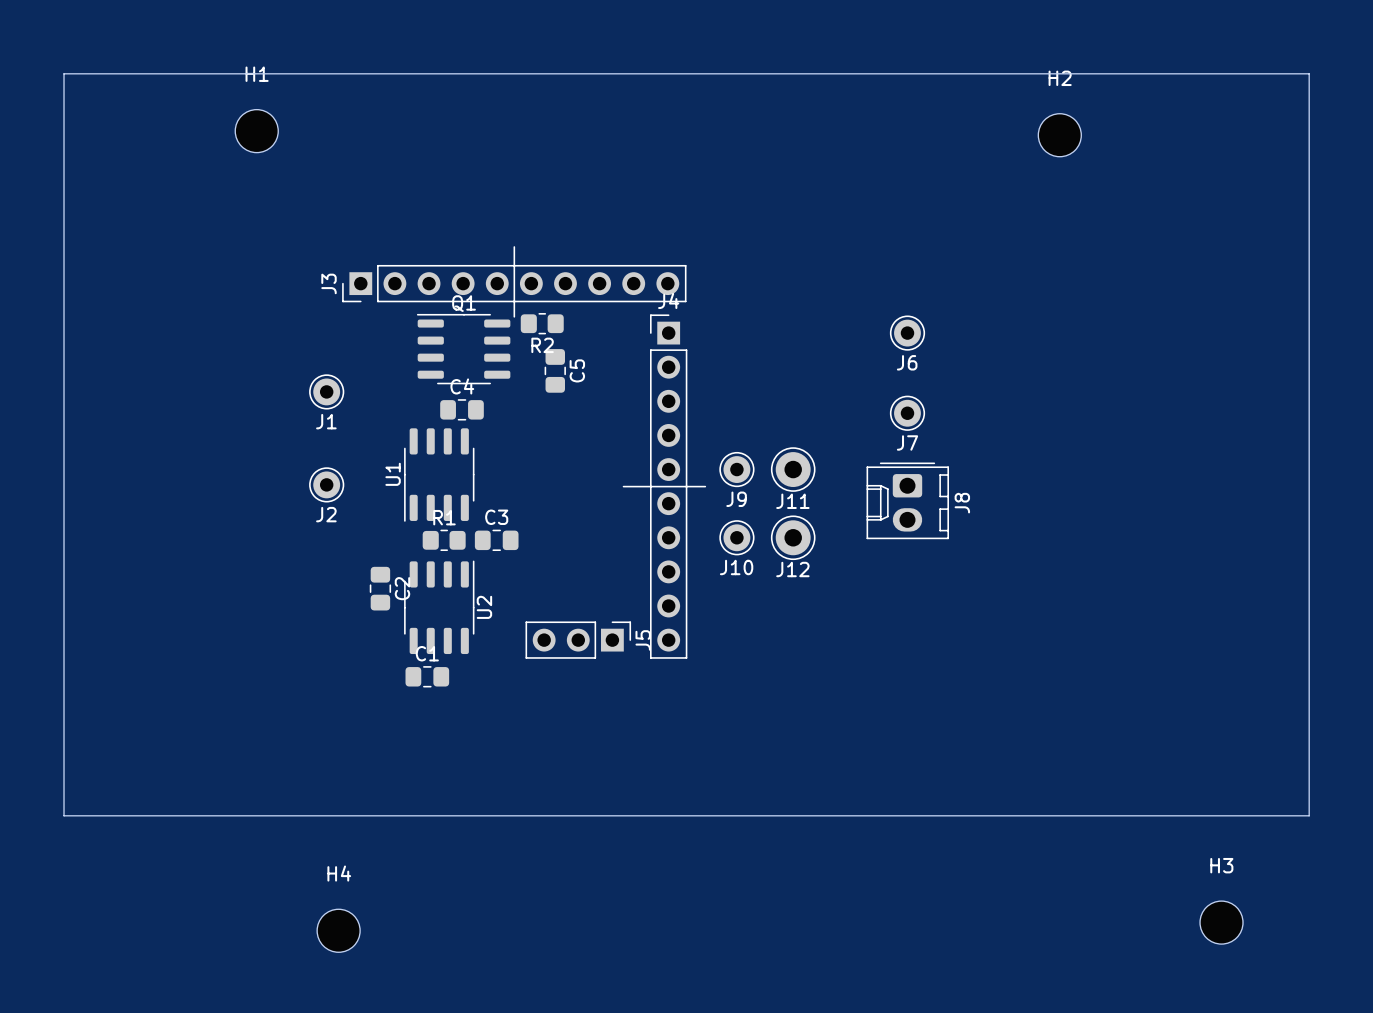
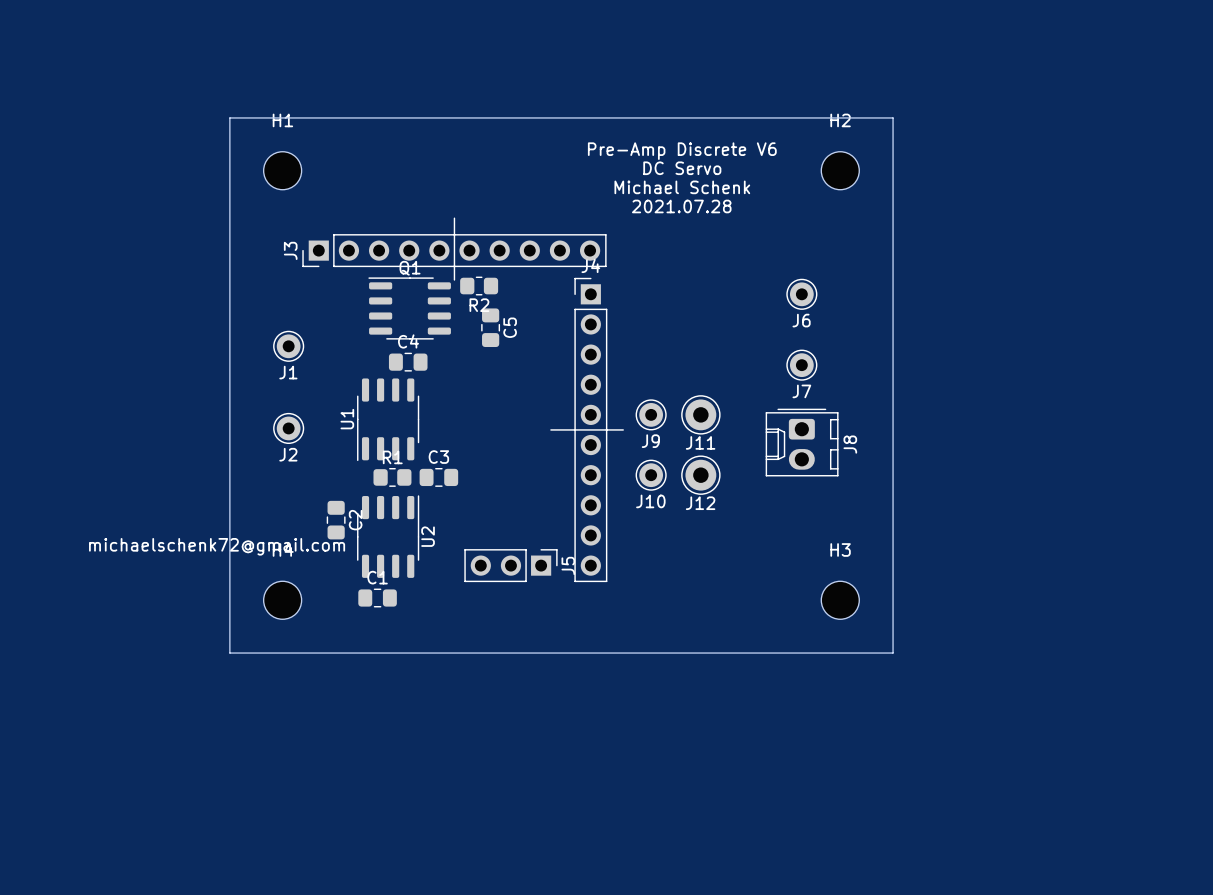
board edge: (64, 73) (64, 815) (1309, 815) (1309, 73) (64, 73) -> none
H1 position: (256, 131) -> (282, 170)
board edge: none -> (229, 117) (229, 653) (893, 653) (893, 117) (229, 117)
H2 position: (1059, 135) -> (840, 170)
text: none -> Pre-Amp Discrete V6 (682, 151)
text: none -> DC Servo (682, 168)
text: none -> Michael Schenk (682, 187)
text: none -> 2021.07.28 (681, 206)
text: none -> michaelschenk72@gmail.com (217, 546)
H3 position: (1221, 922) -> (840, 600)
H4 position: (338, 930) -> (282, 600)

